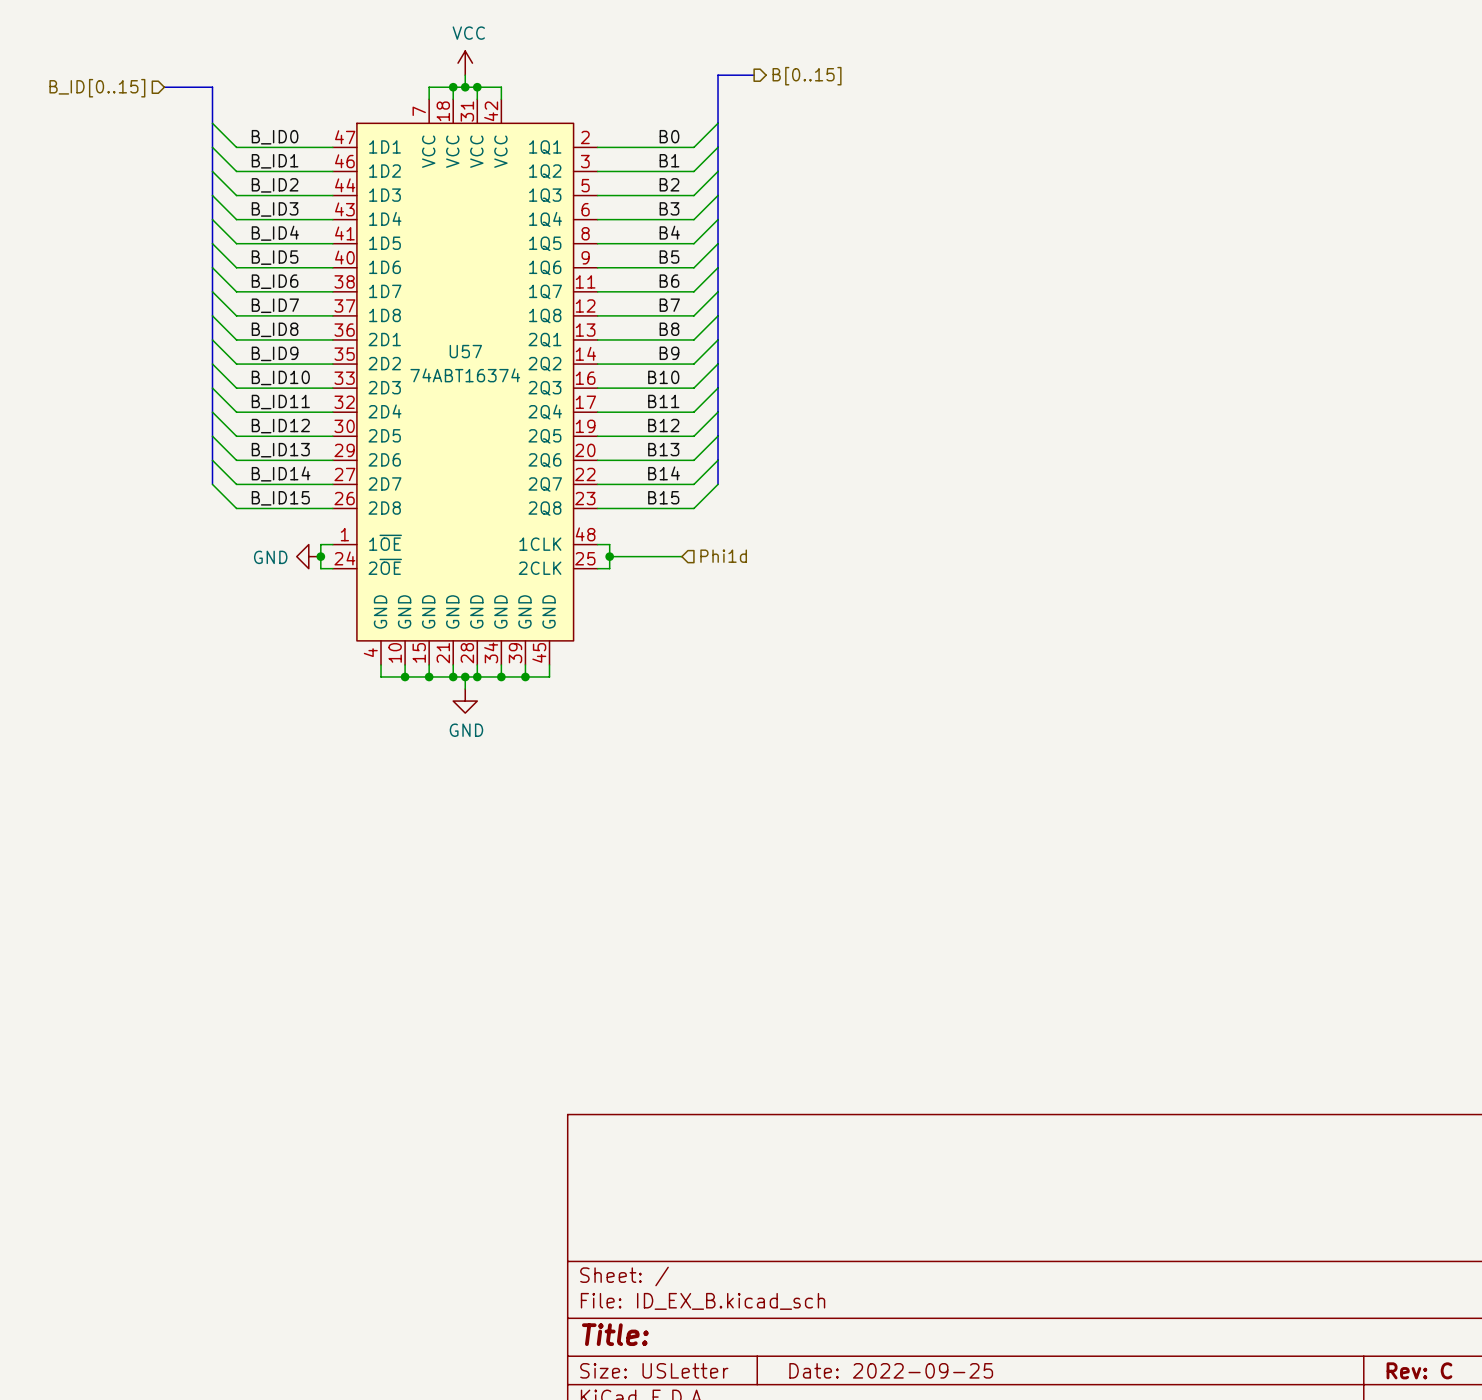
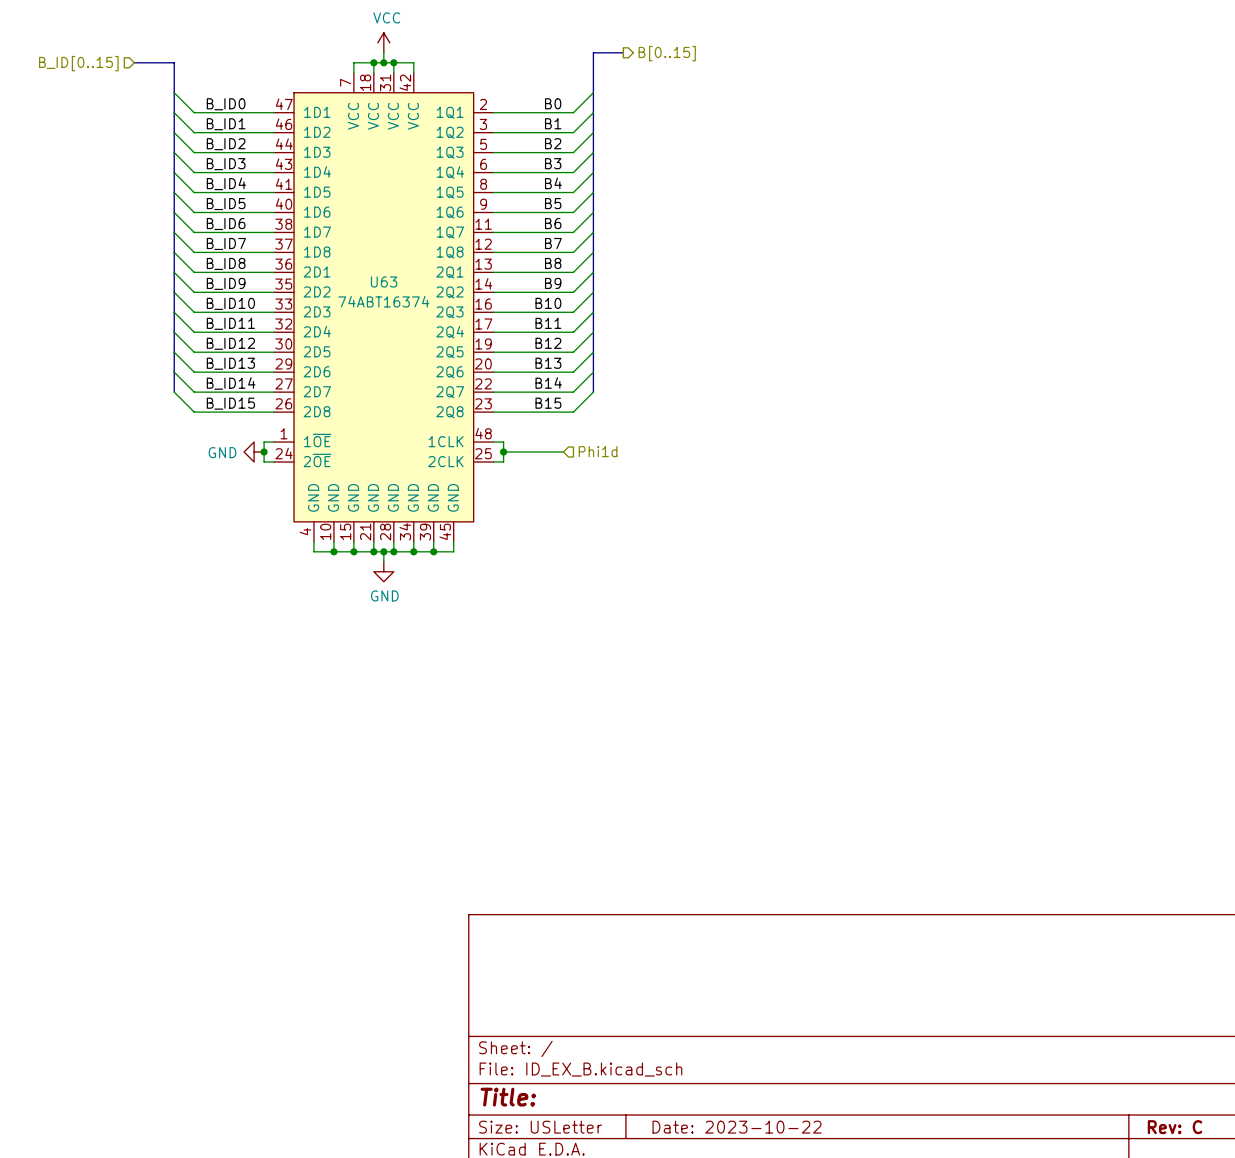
U57 name: U57 (465, 351) -> U63 (384, 281)
title block: Date: 2022-09-25 (891, 1370) -> Date: 2023-10-22 (737, 1127)

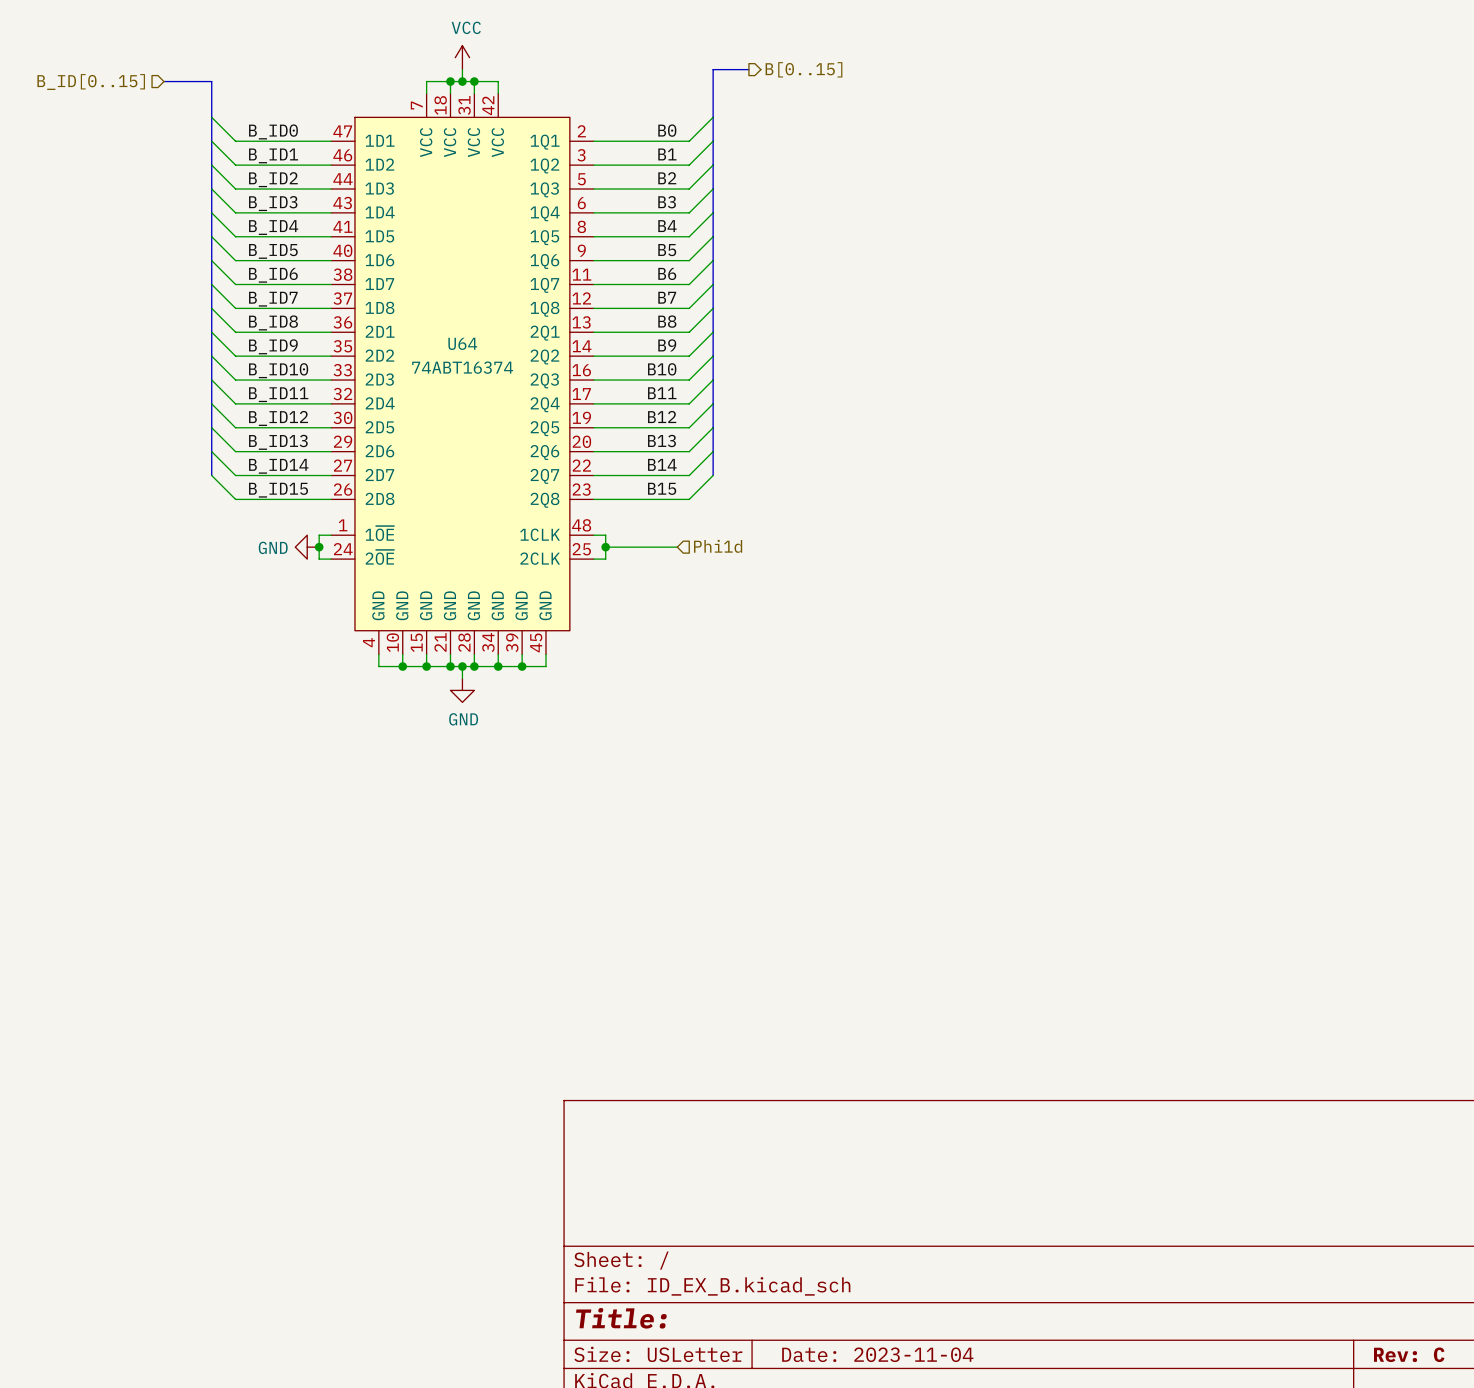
U63 name: U63 (384, 281) -> U64 (462, 343)
title block: Date: 2023-10-22 (737, 1127) -> Date: 2023-11-04 (877, 1354)

